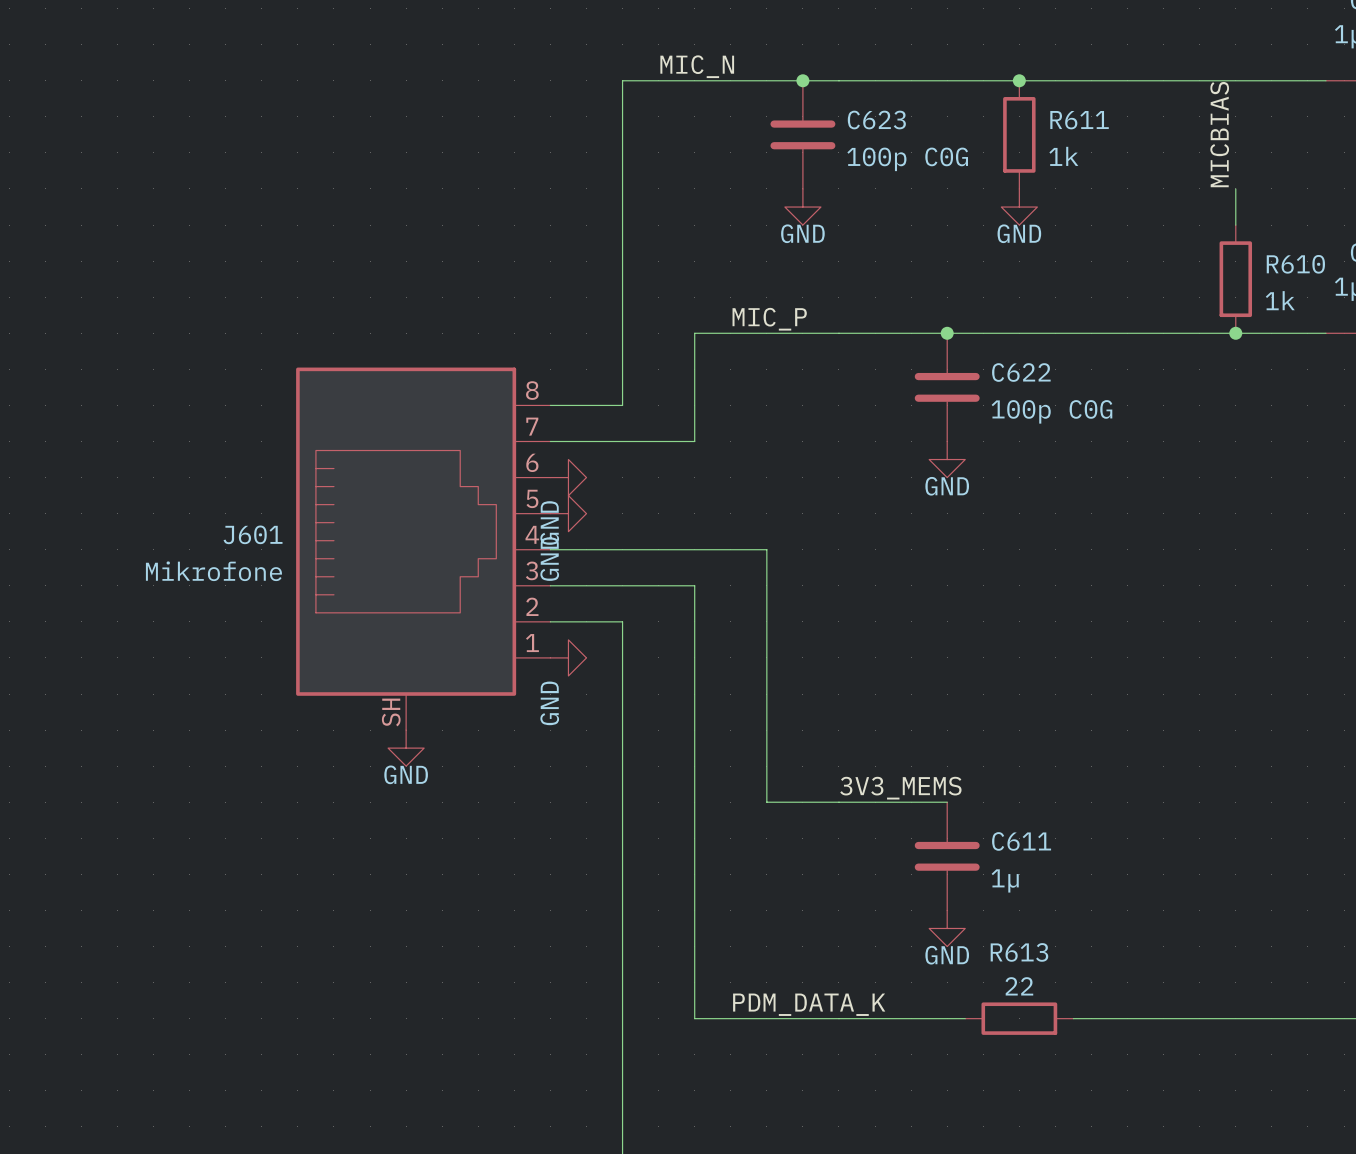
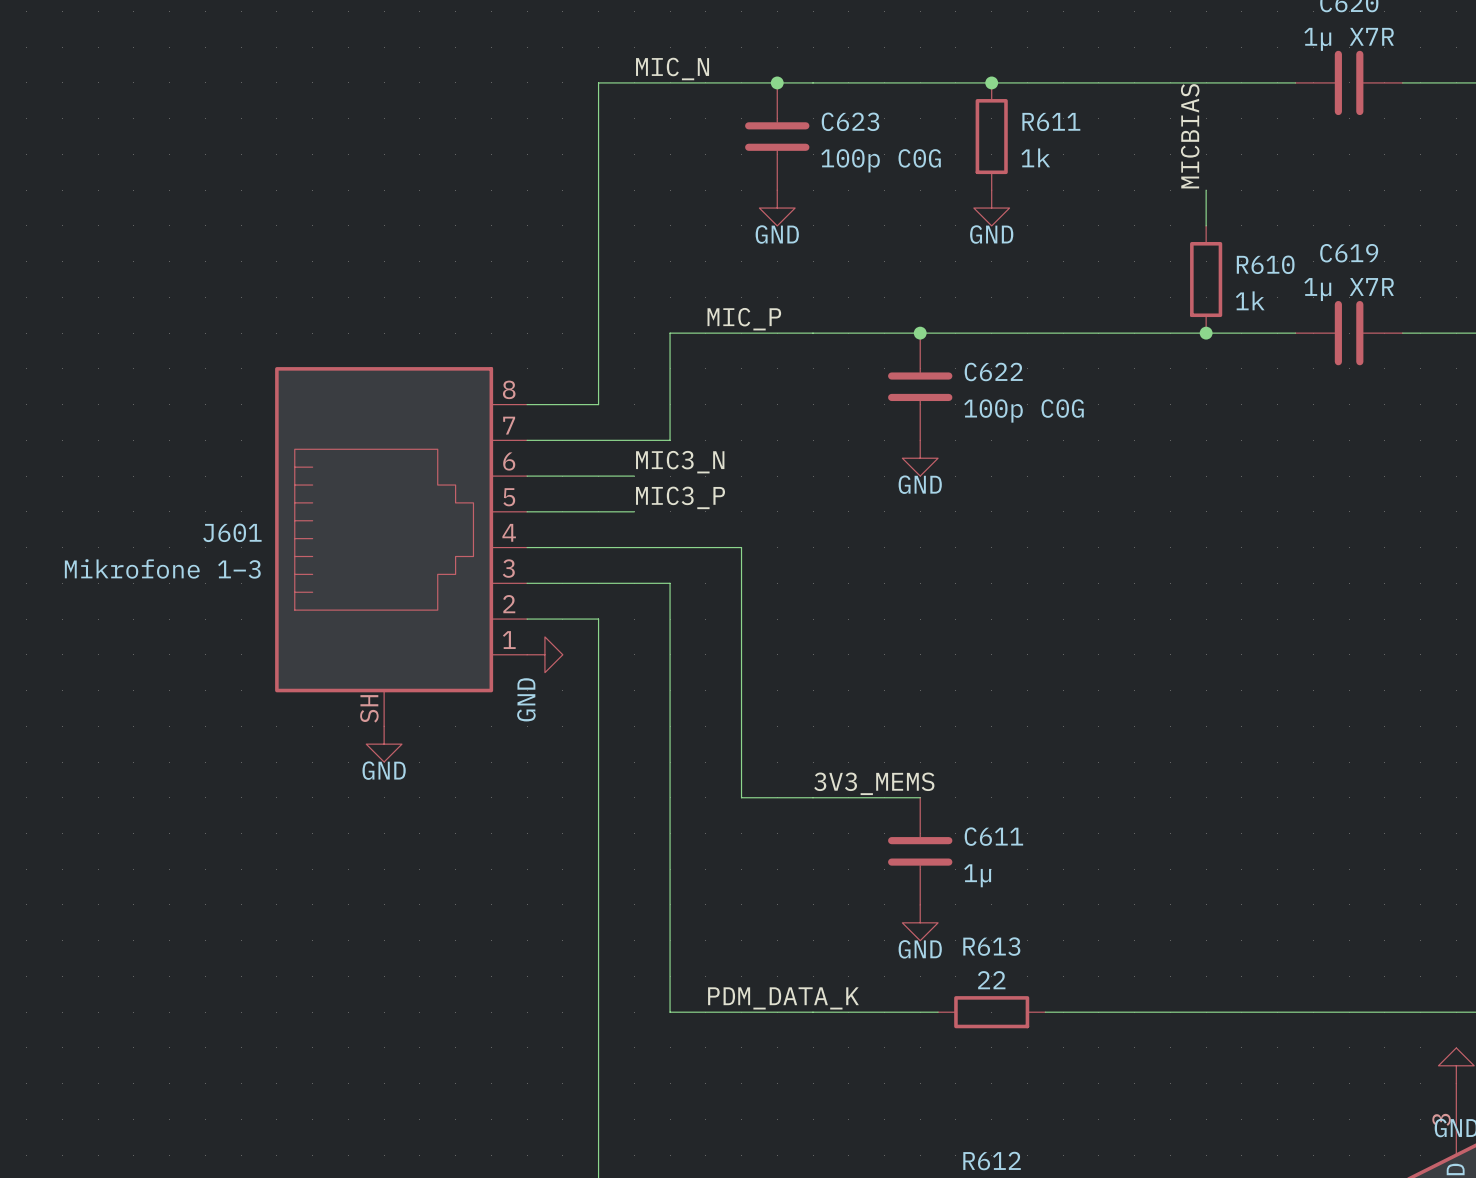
label: none -> MIC3_N (680, 462)
wire: none -> (527, 476) (634, 476)
power symbol: GND (568, 477) -> none
label: none -> MIC3_P (680, 497)
wire: none -> (527, 511) (634, 511)
power symbol: GND (568, 513) -> none
J601 value: Mikrofone (213, 571) -> Mikrofone 1–3 (162, 568)

